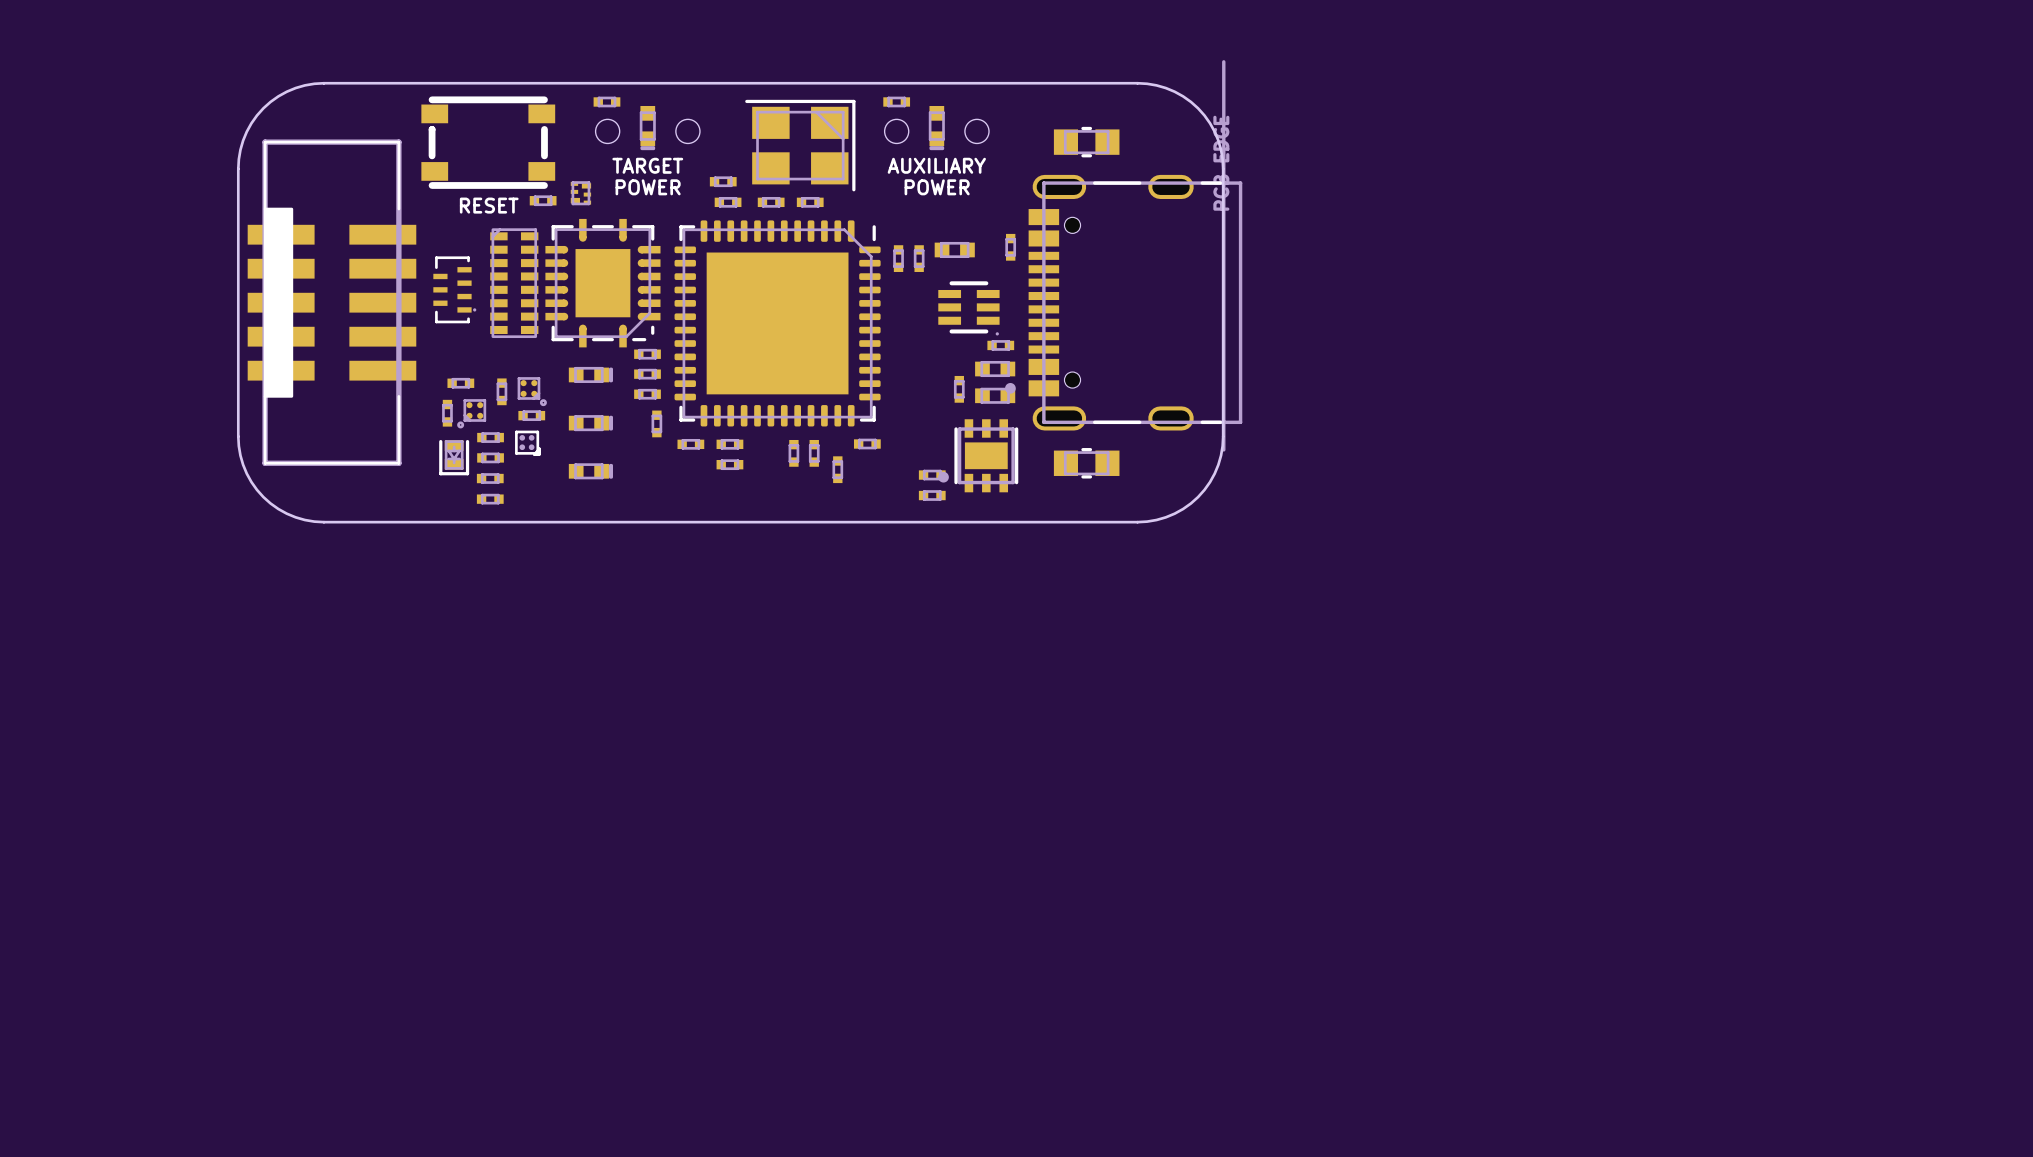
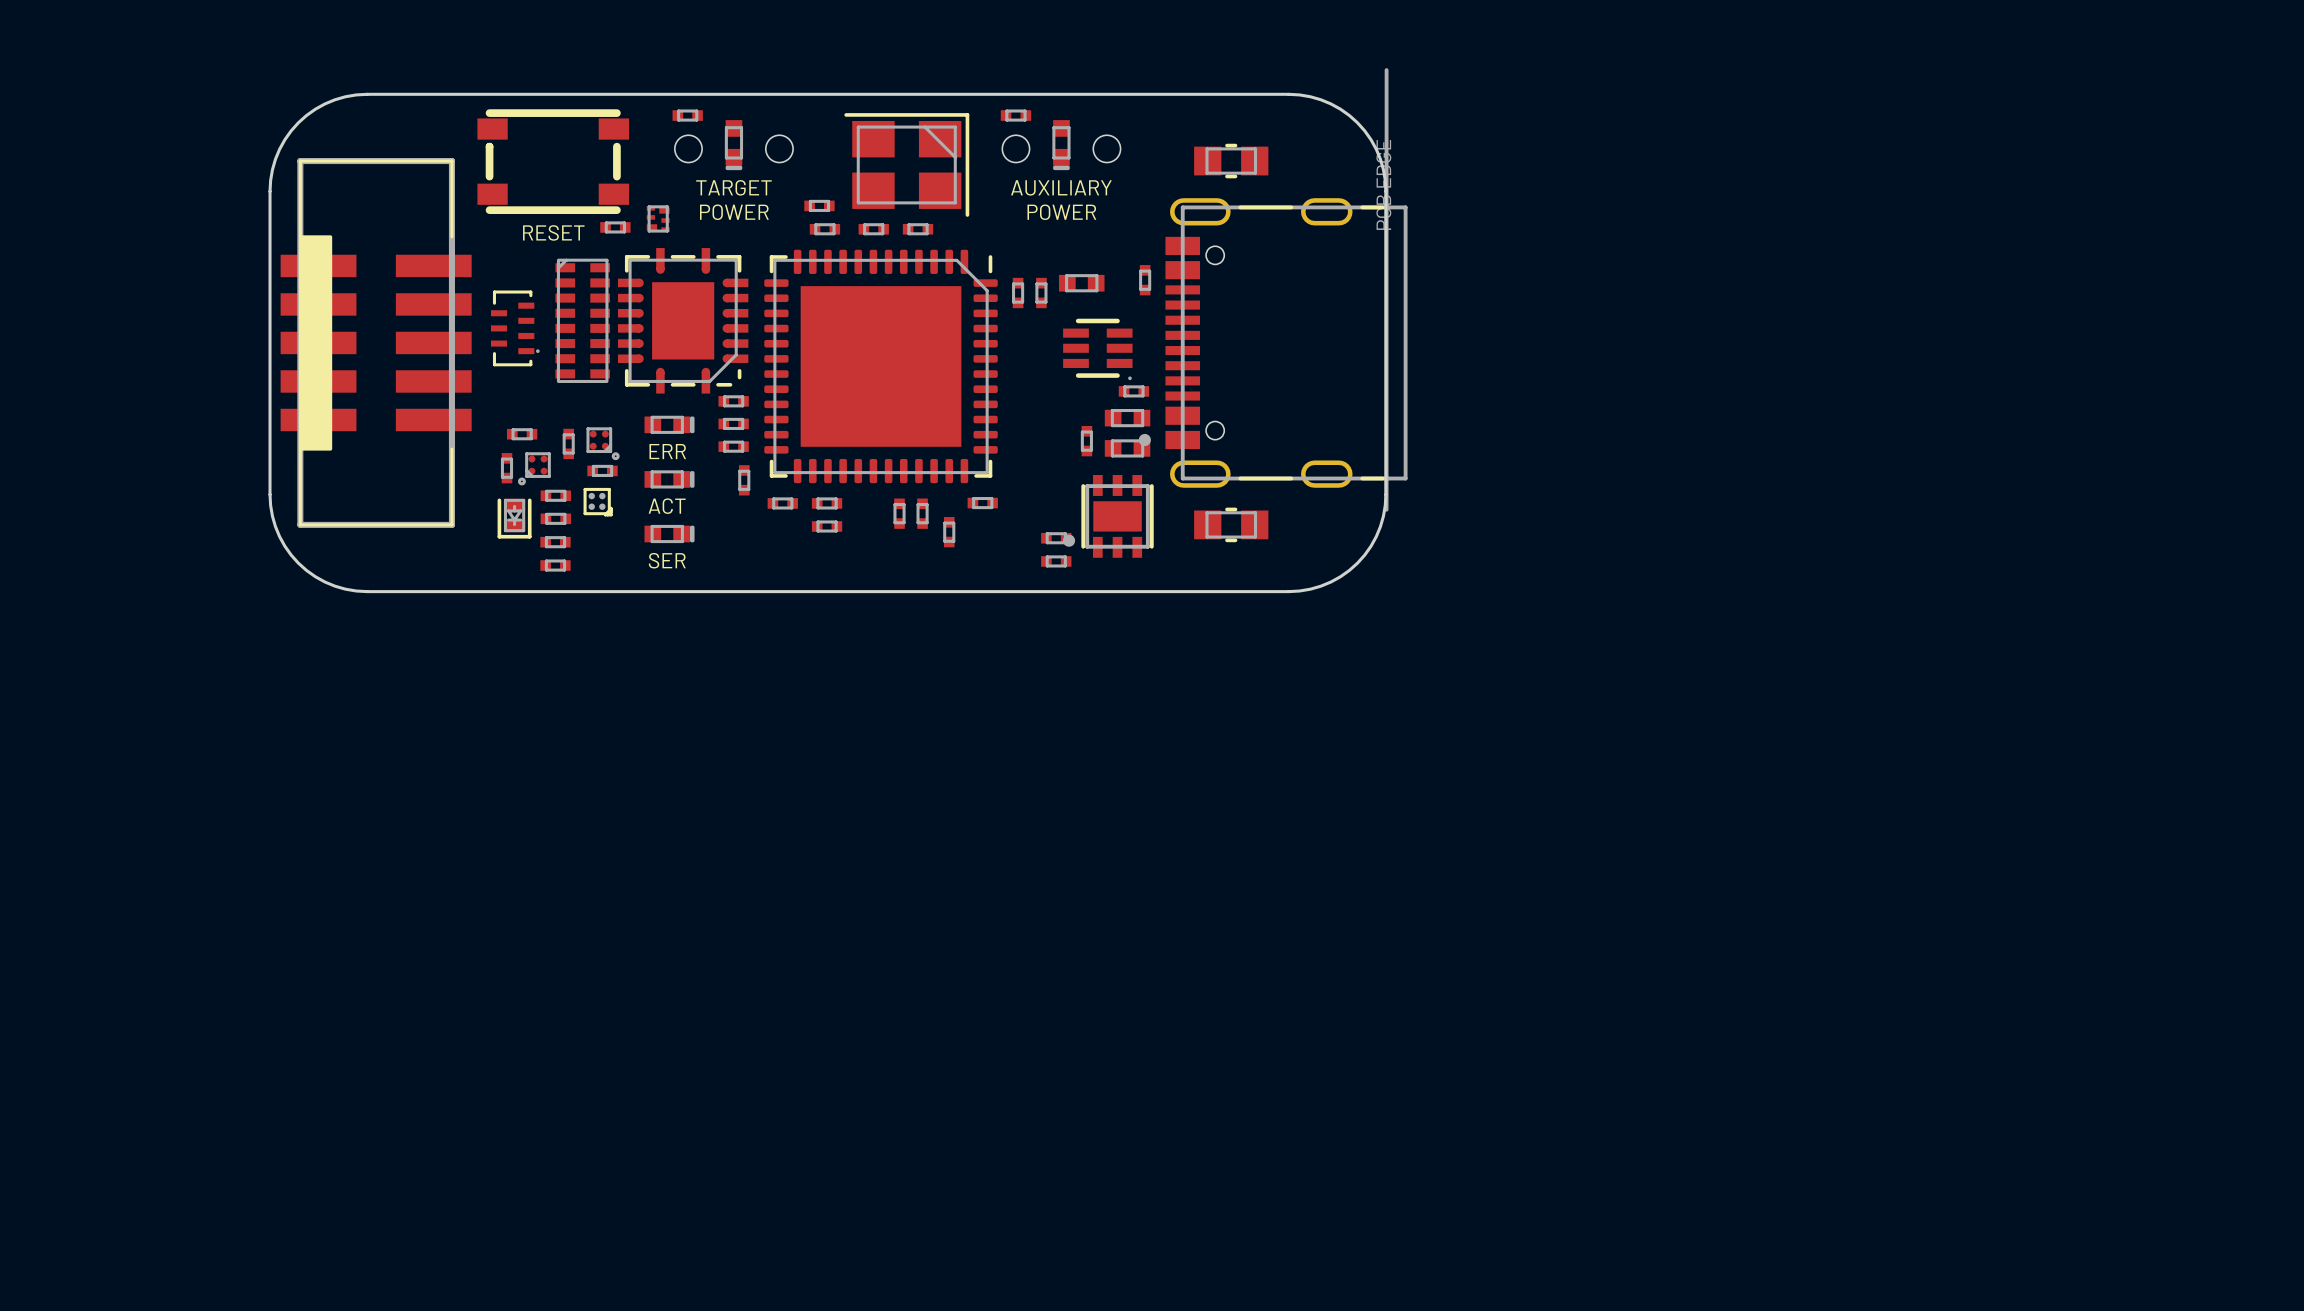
part value: none -> ERR (667, 451)
part value: none -> ACT (667, 506)
part value: none -> SER (667, 560)

